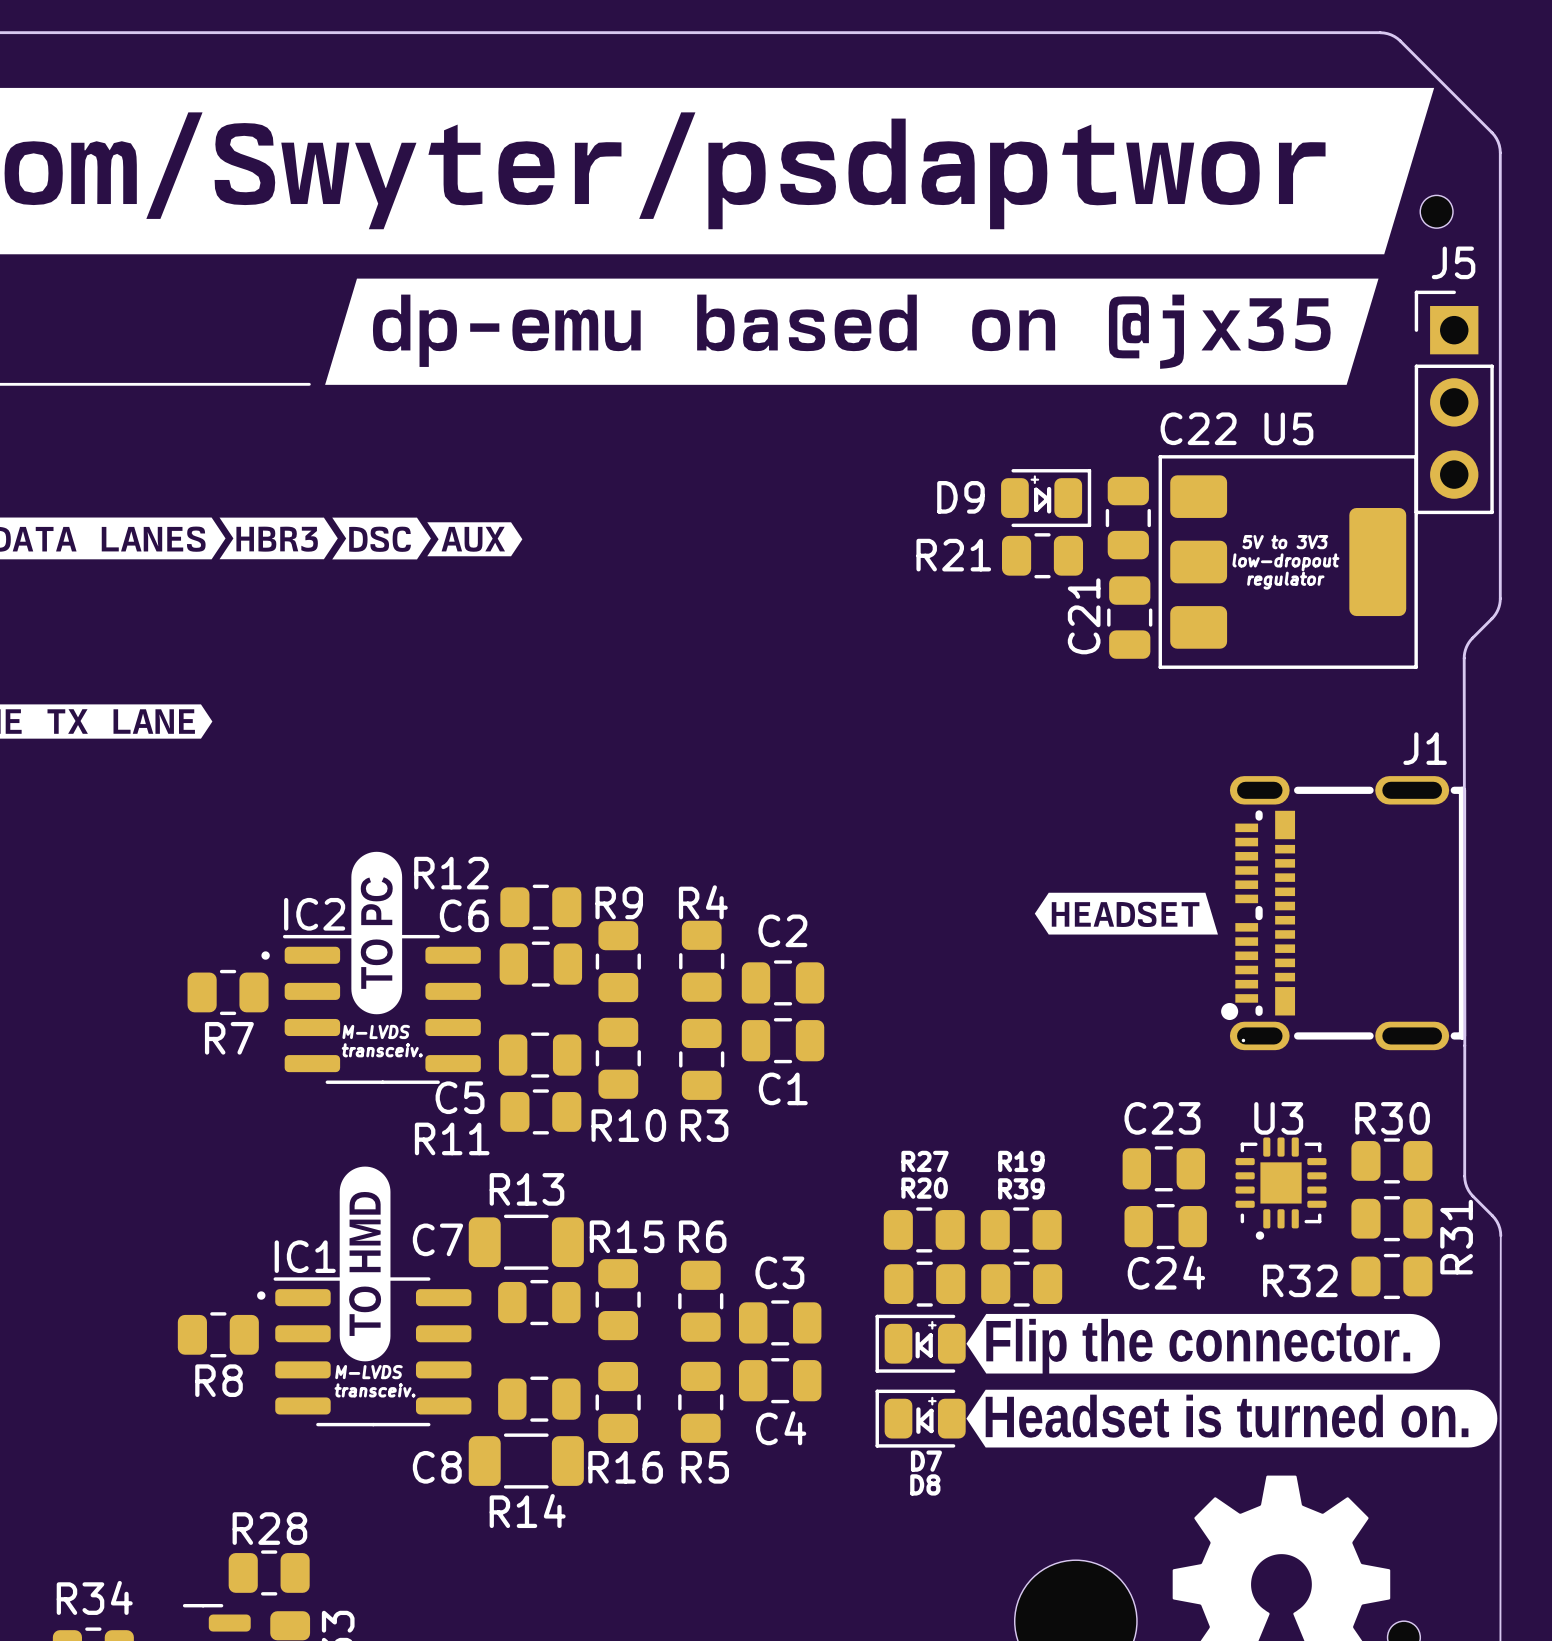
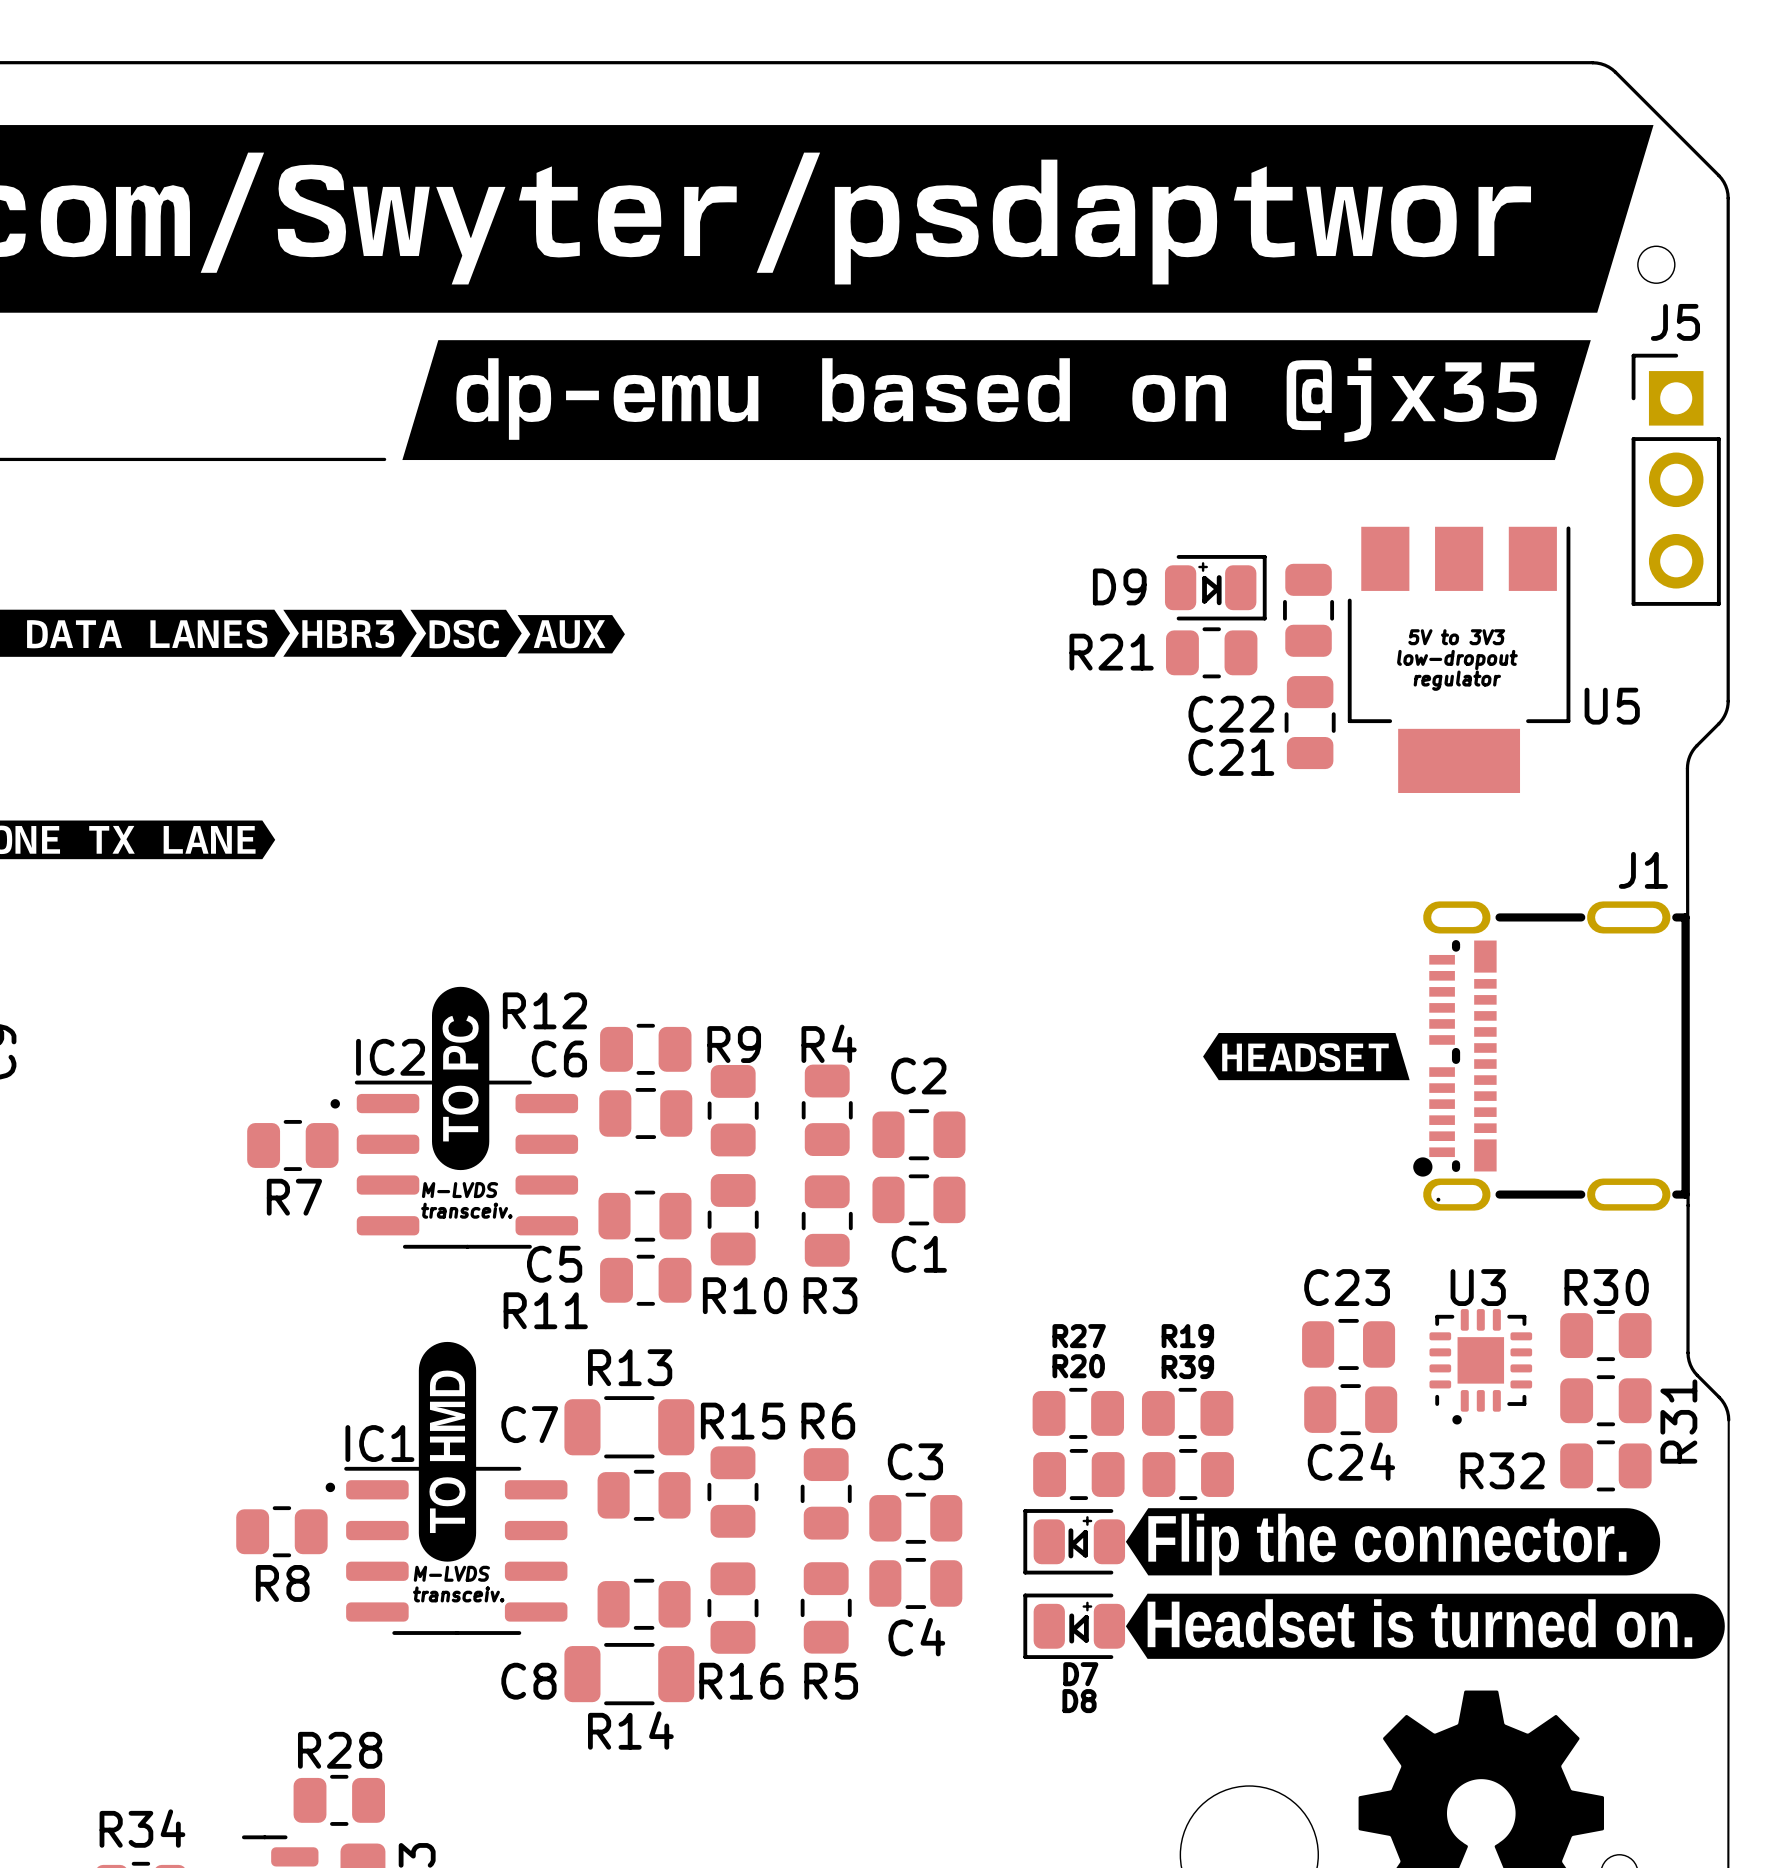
C22 name position: C22 (1198, 428) -> C22 (1231, 714)
U5 name position: U5 (1288, 428) -> U5 (1612, 706)
U5 footprint: [1158, 455, 1418, 669] -> [1347, 526, 1571, 794]
text position: 5V to 3V3 (1285, 542) -> 5V to 3V3 (1456, 637)
text position: low-dropout (1285, 562) -> low-dropout (1457, 660)
text position: regulator (1285, 580) -> regulator (1457, 680)
C21 name rotation: 0° (1084, 616) -> 90° clockwise (1231, 757)

